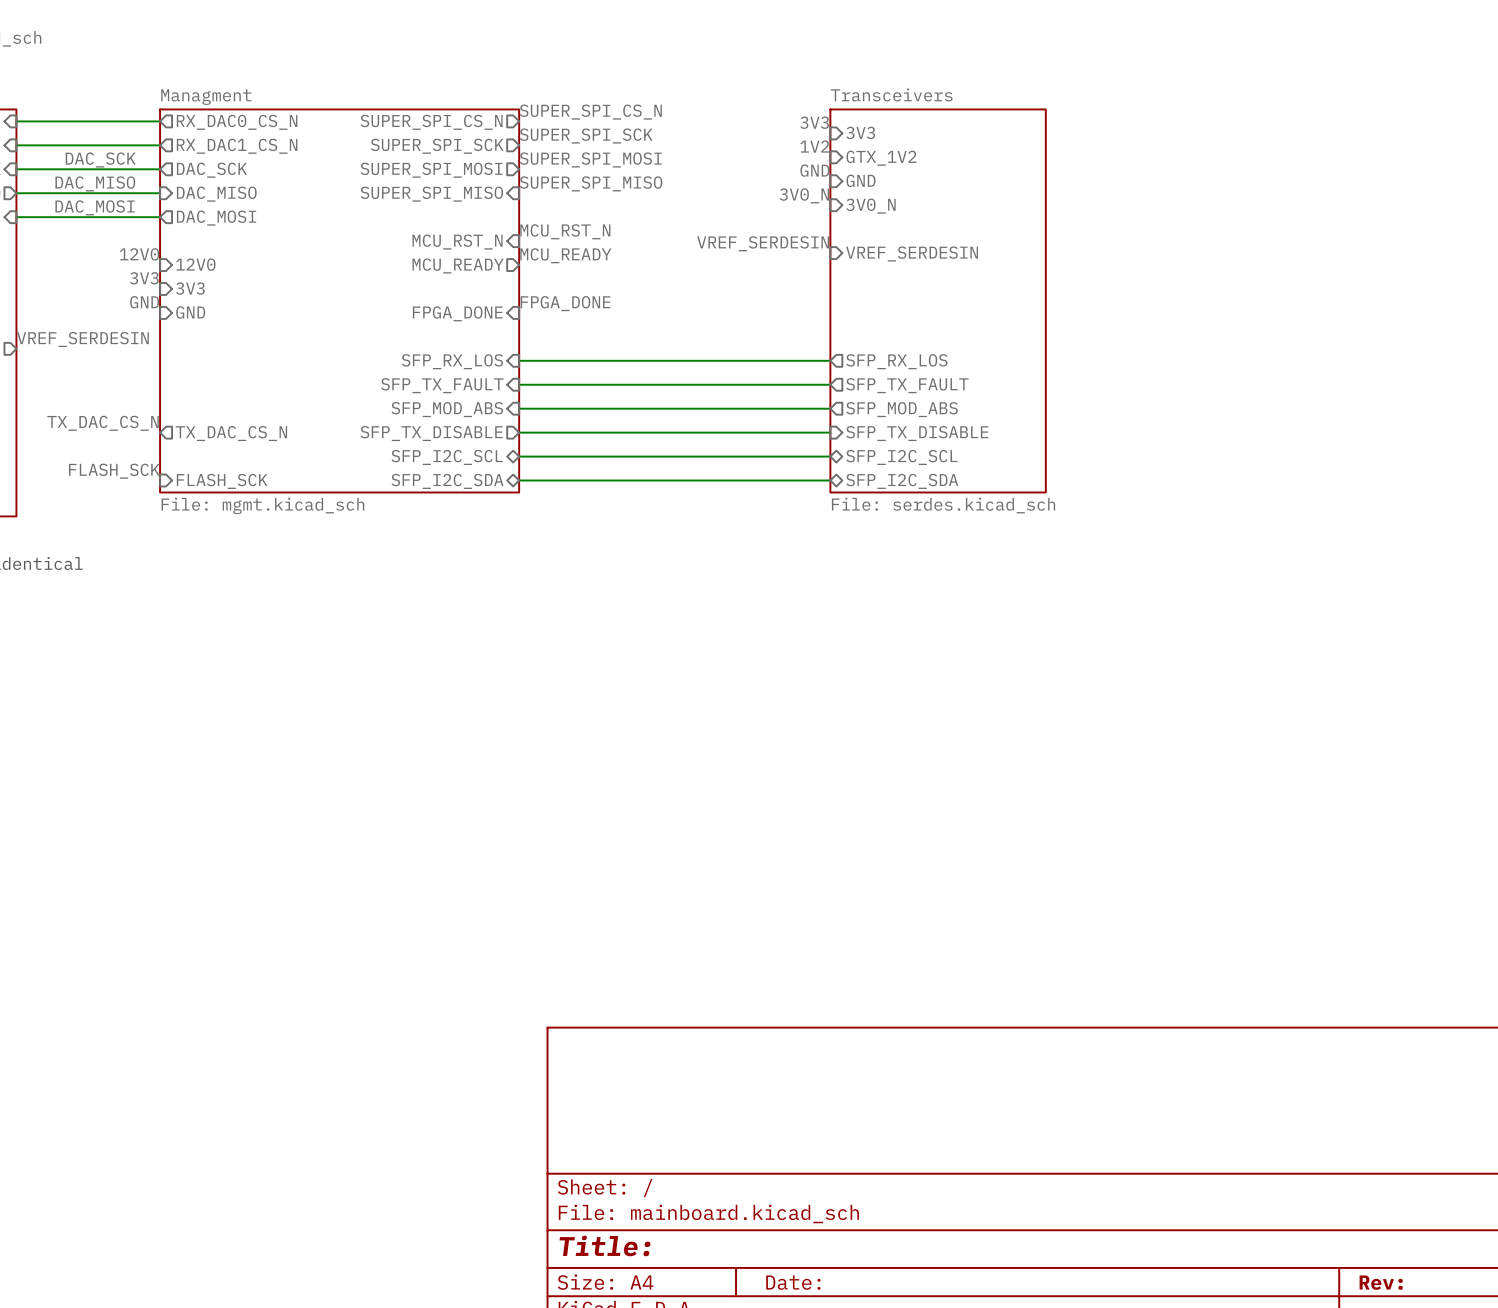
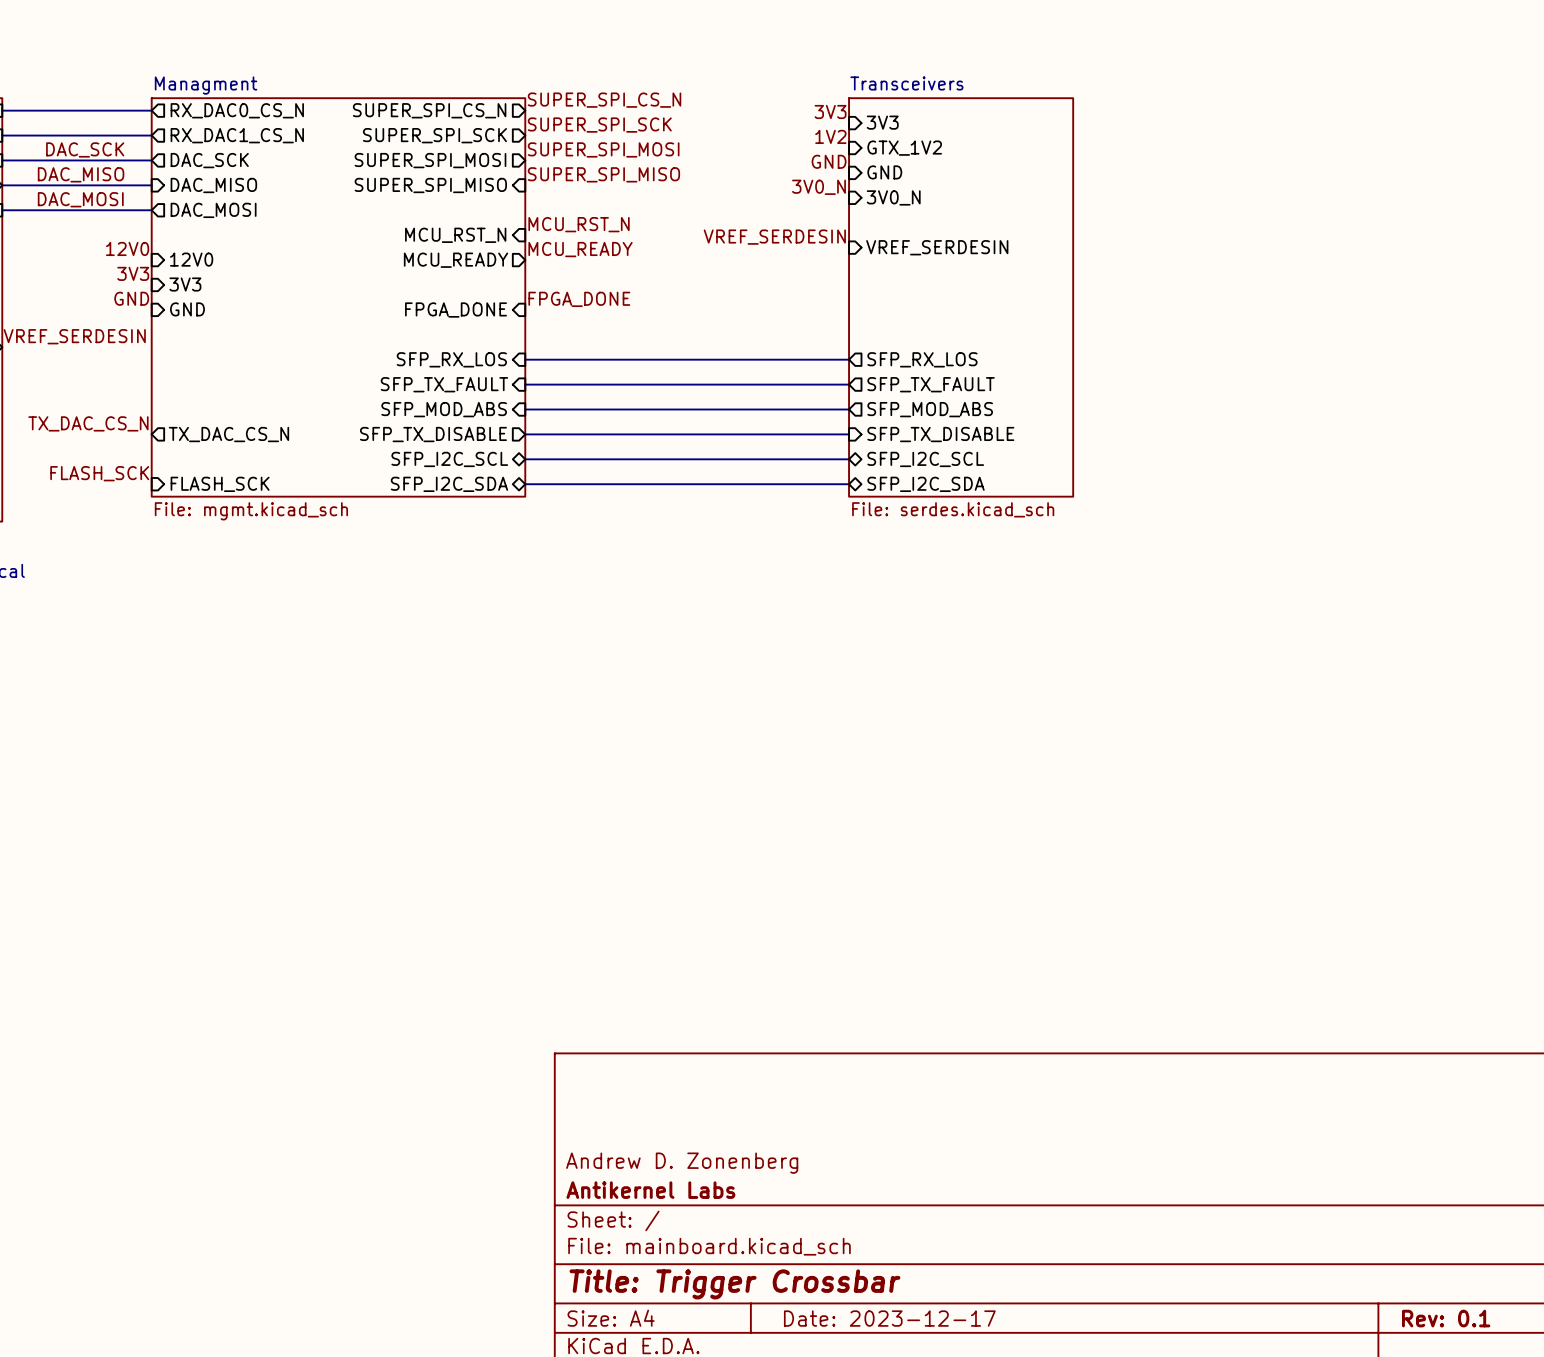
title block: none -> Andrew D. Zonenberg (682, 1163)
title block: none -> Antikernel Labs (650, 1190)
title block: Title: (605, 1245) -> Title: Trigger Crossbar (734, 1284)
title block: Date: (793, 1282) -> Date: 2023-12-17 (889, 1318)
title block: Rev: (1381, 1282) -> Rev: 0.1 (1446, 1318)

